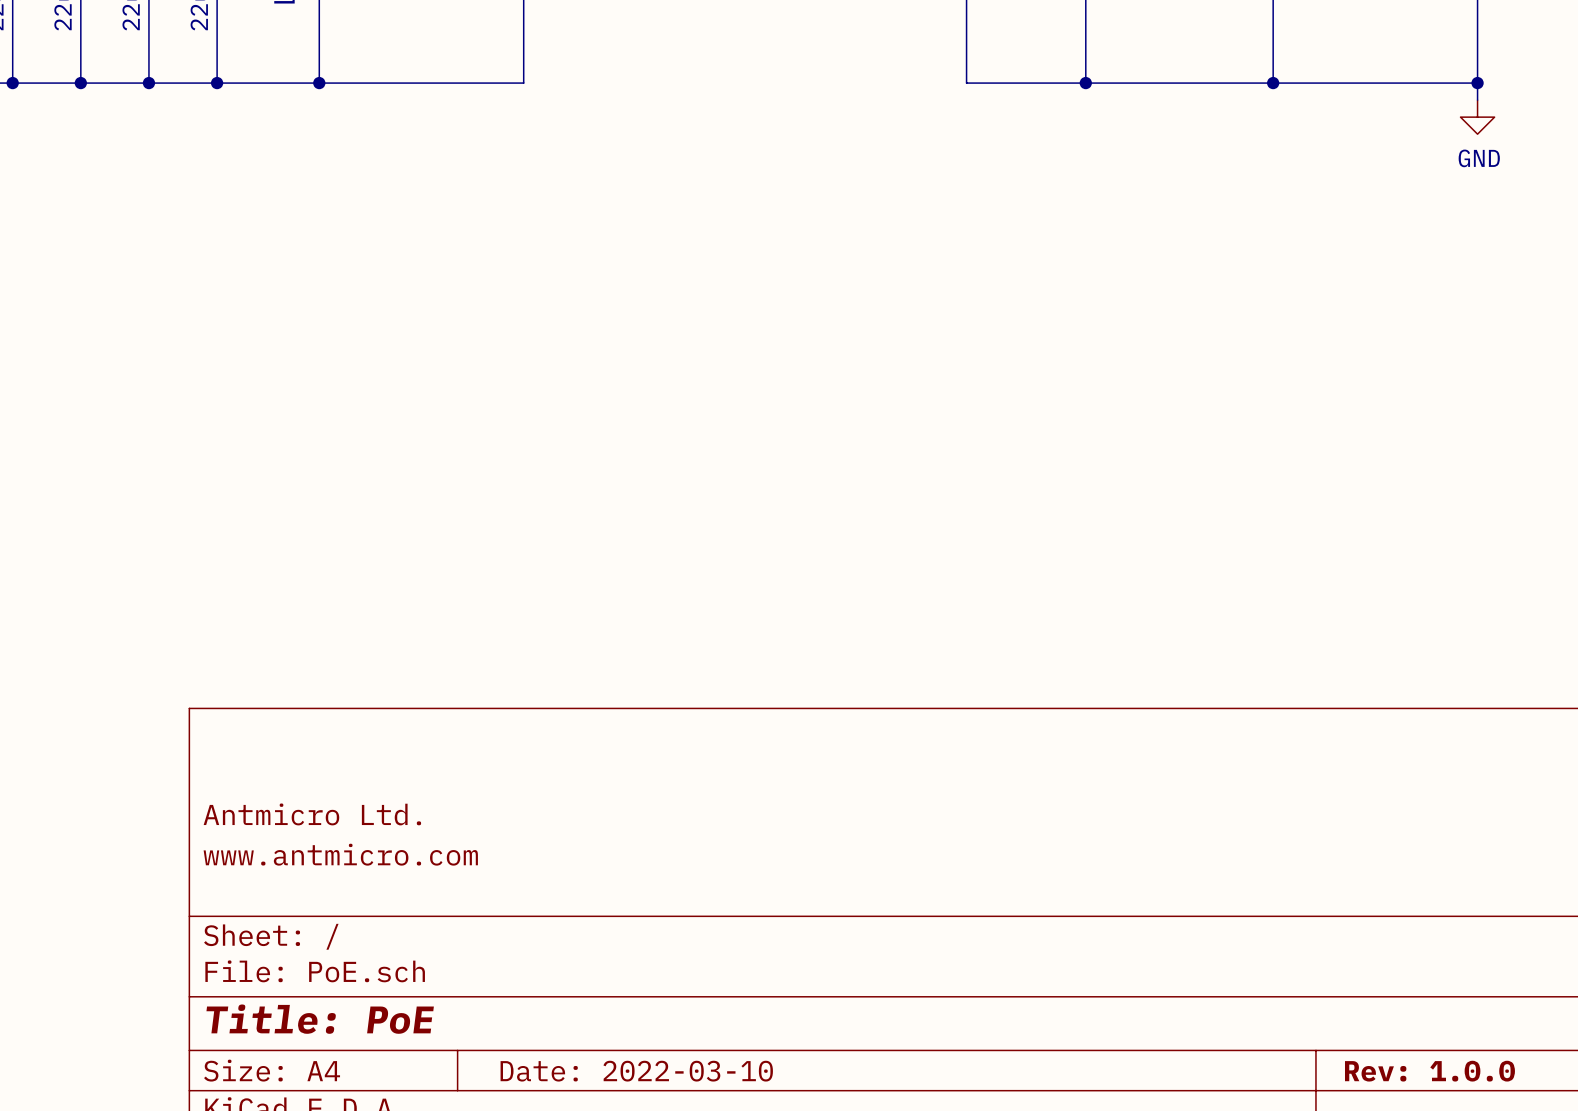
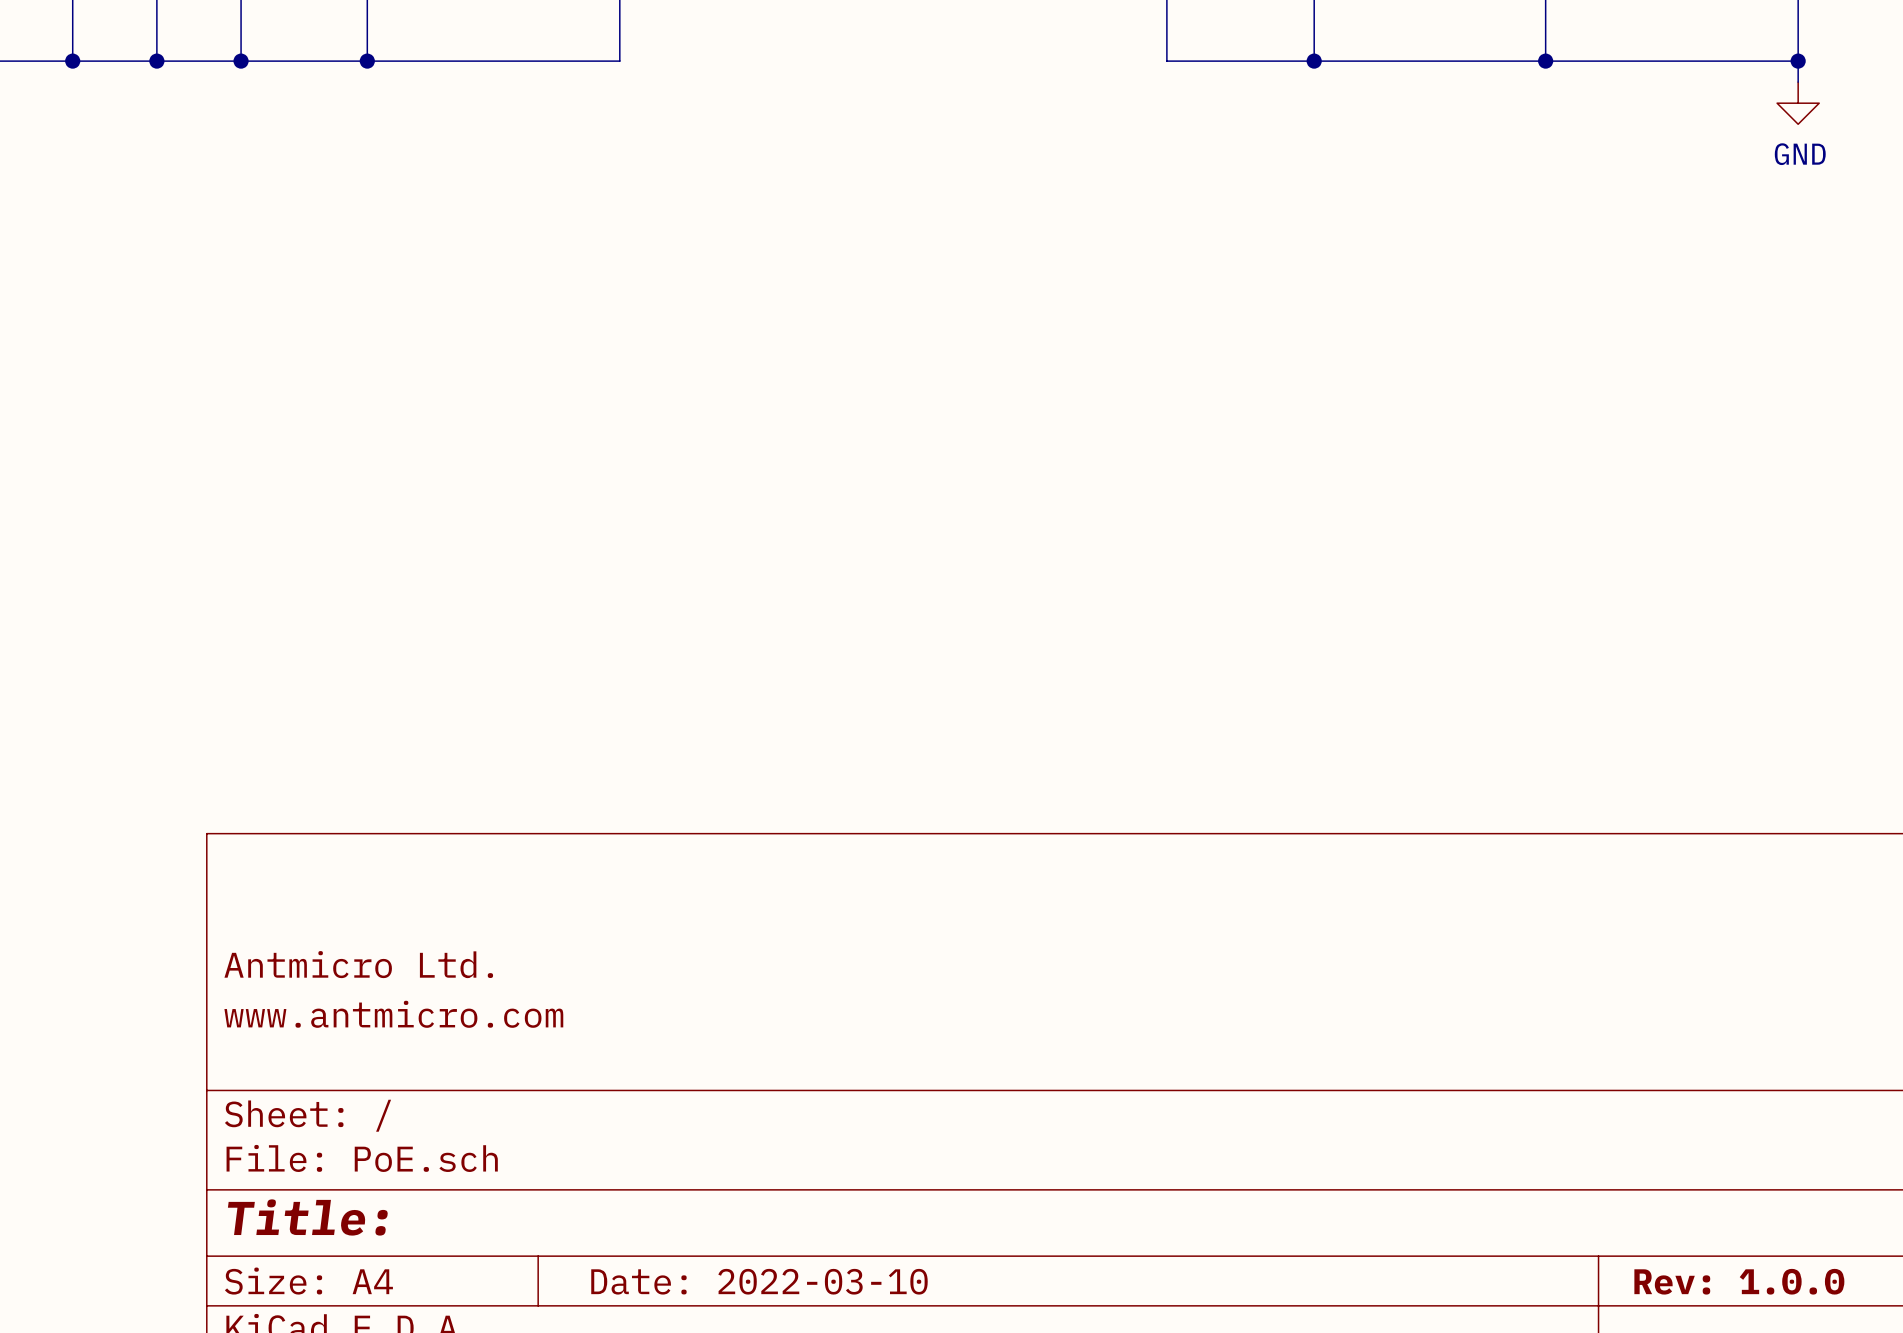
title block: Title: PoE (320, 1019) -> Title: (307, 1217)

